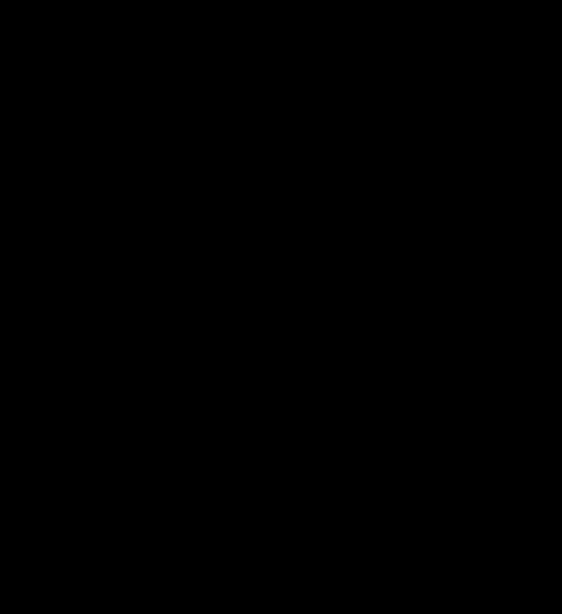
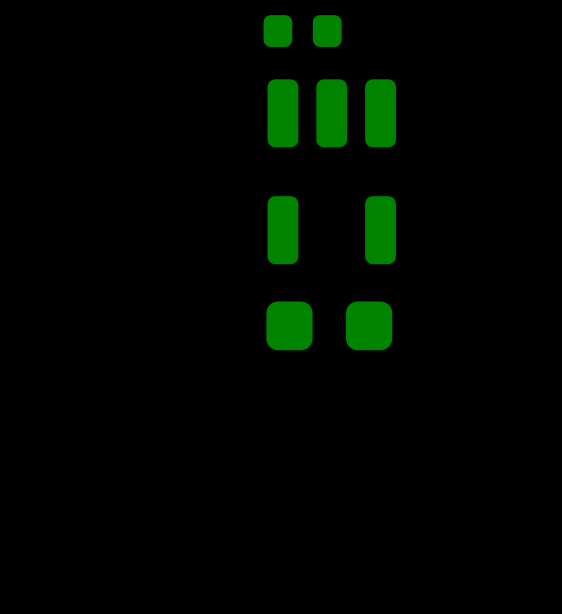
part: none -> (302, 31)
part: none -> (331, 171)
part: none -> (329, 325)

